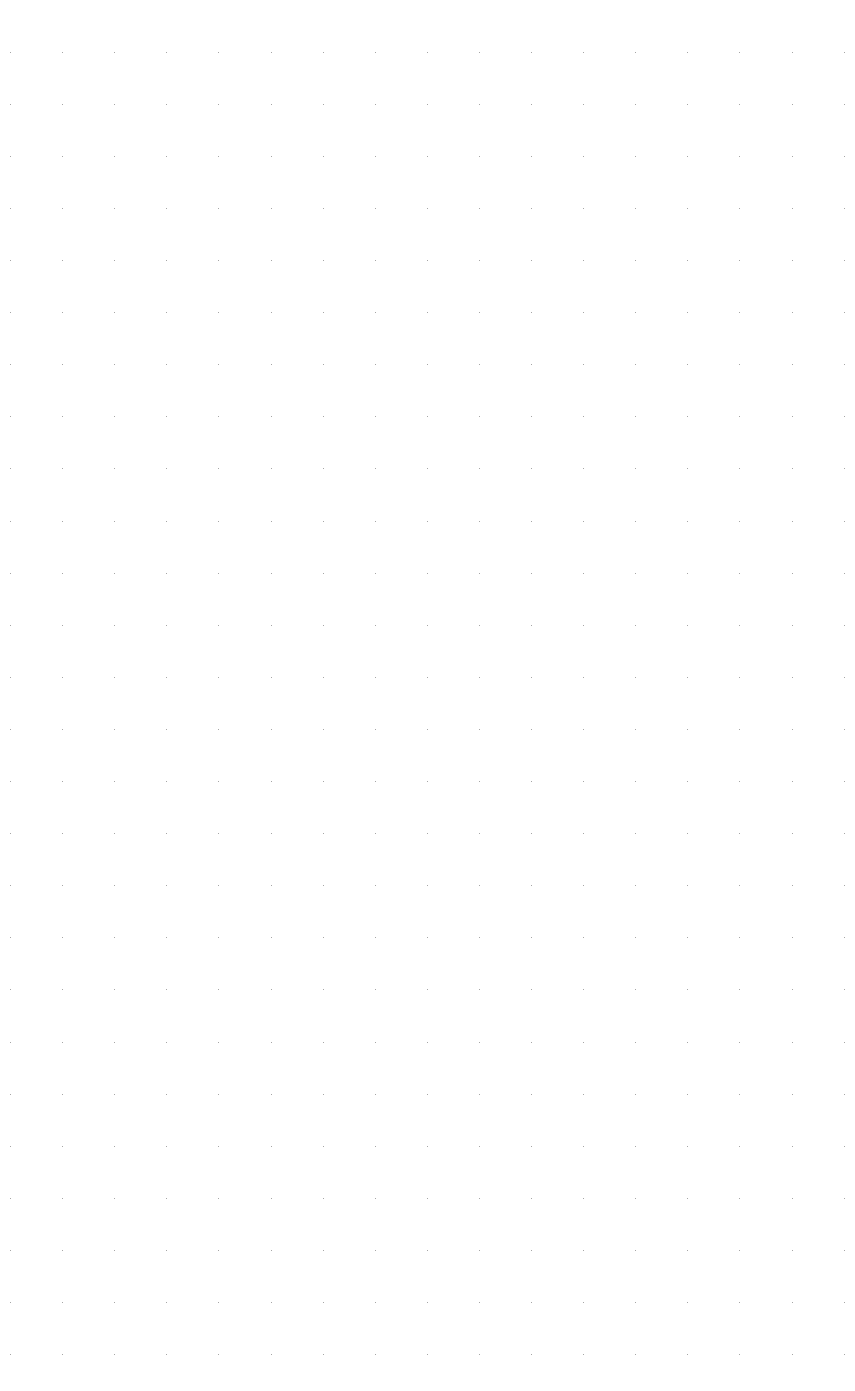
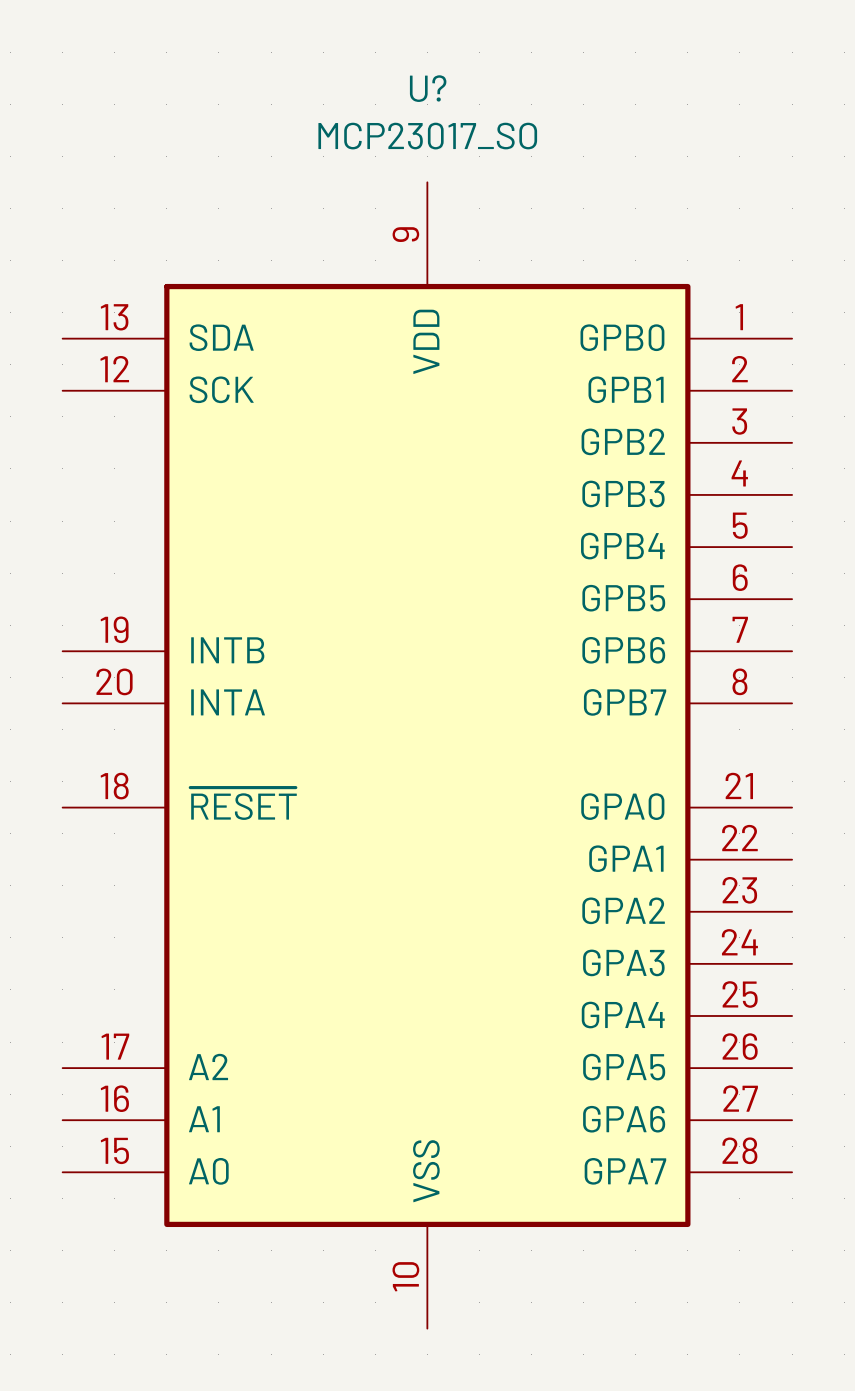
U?: none -> MCP23017_SO (427, 755)

